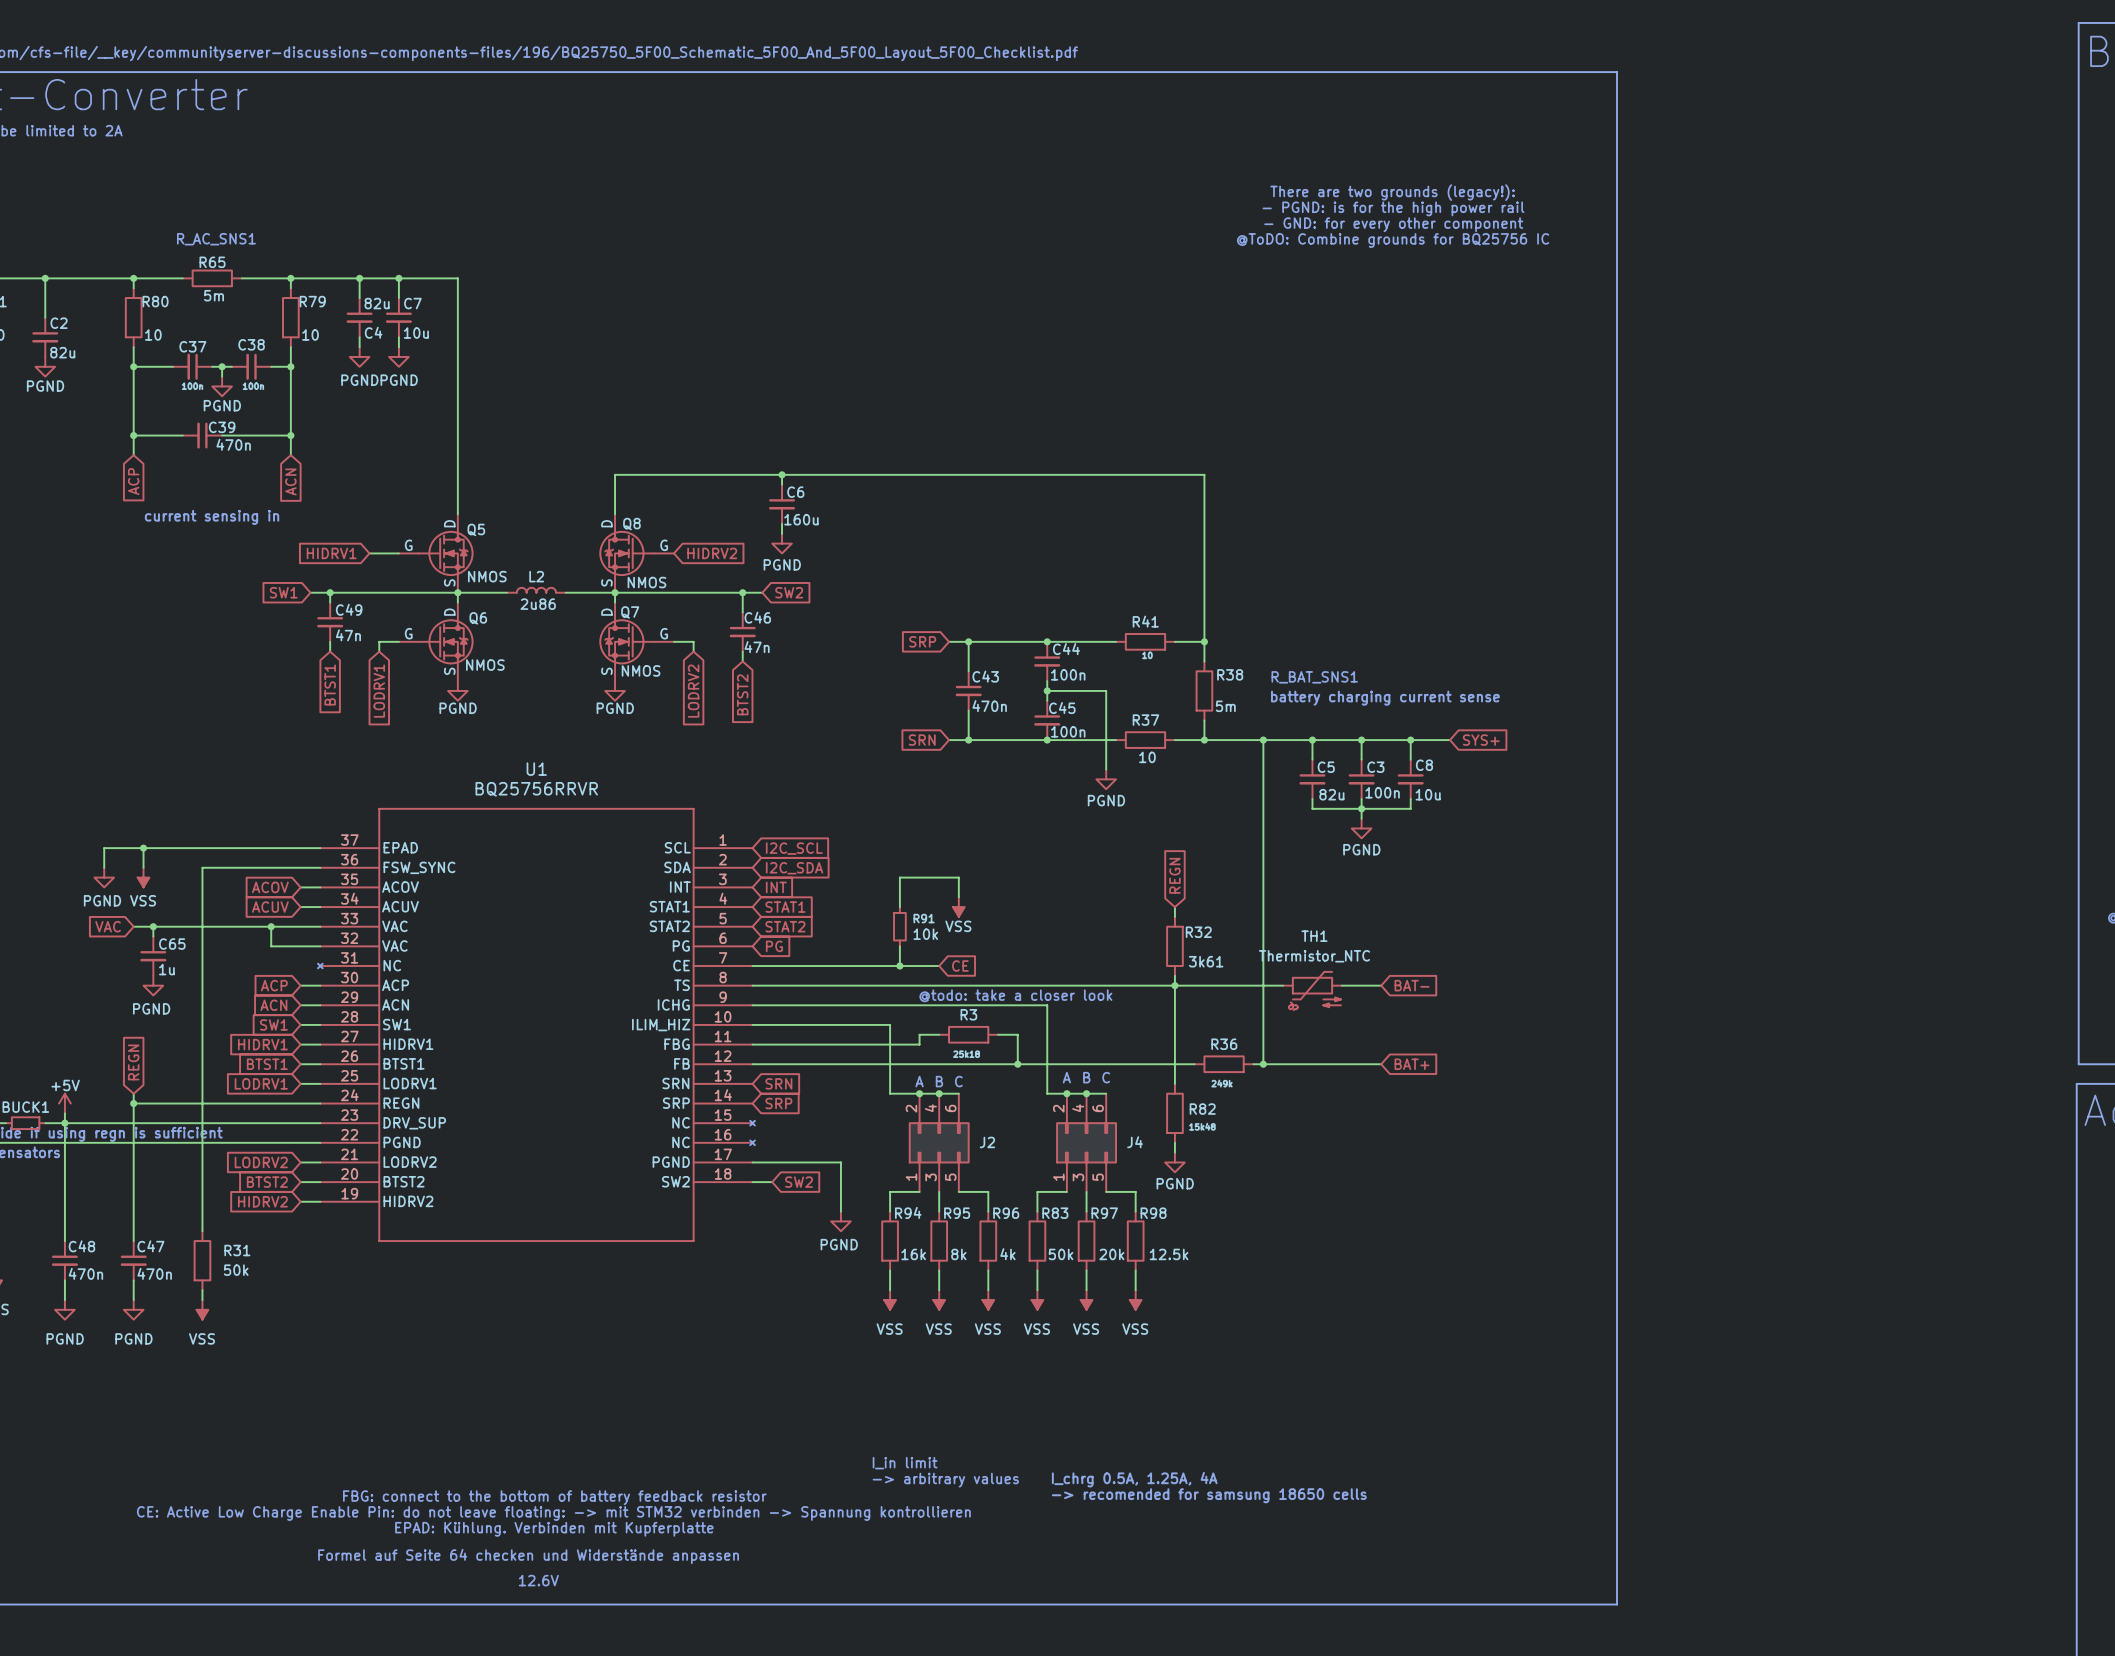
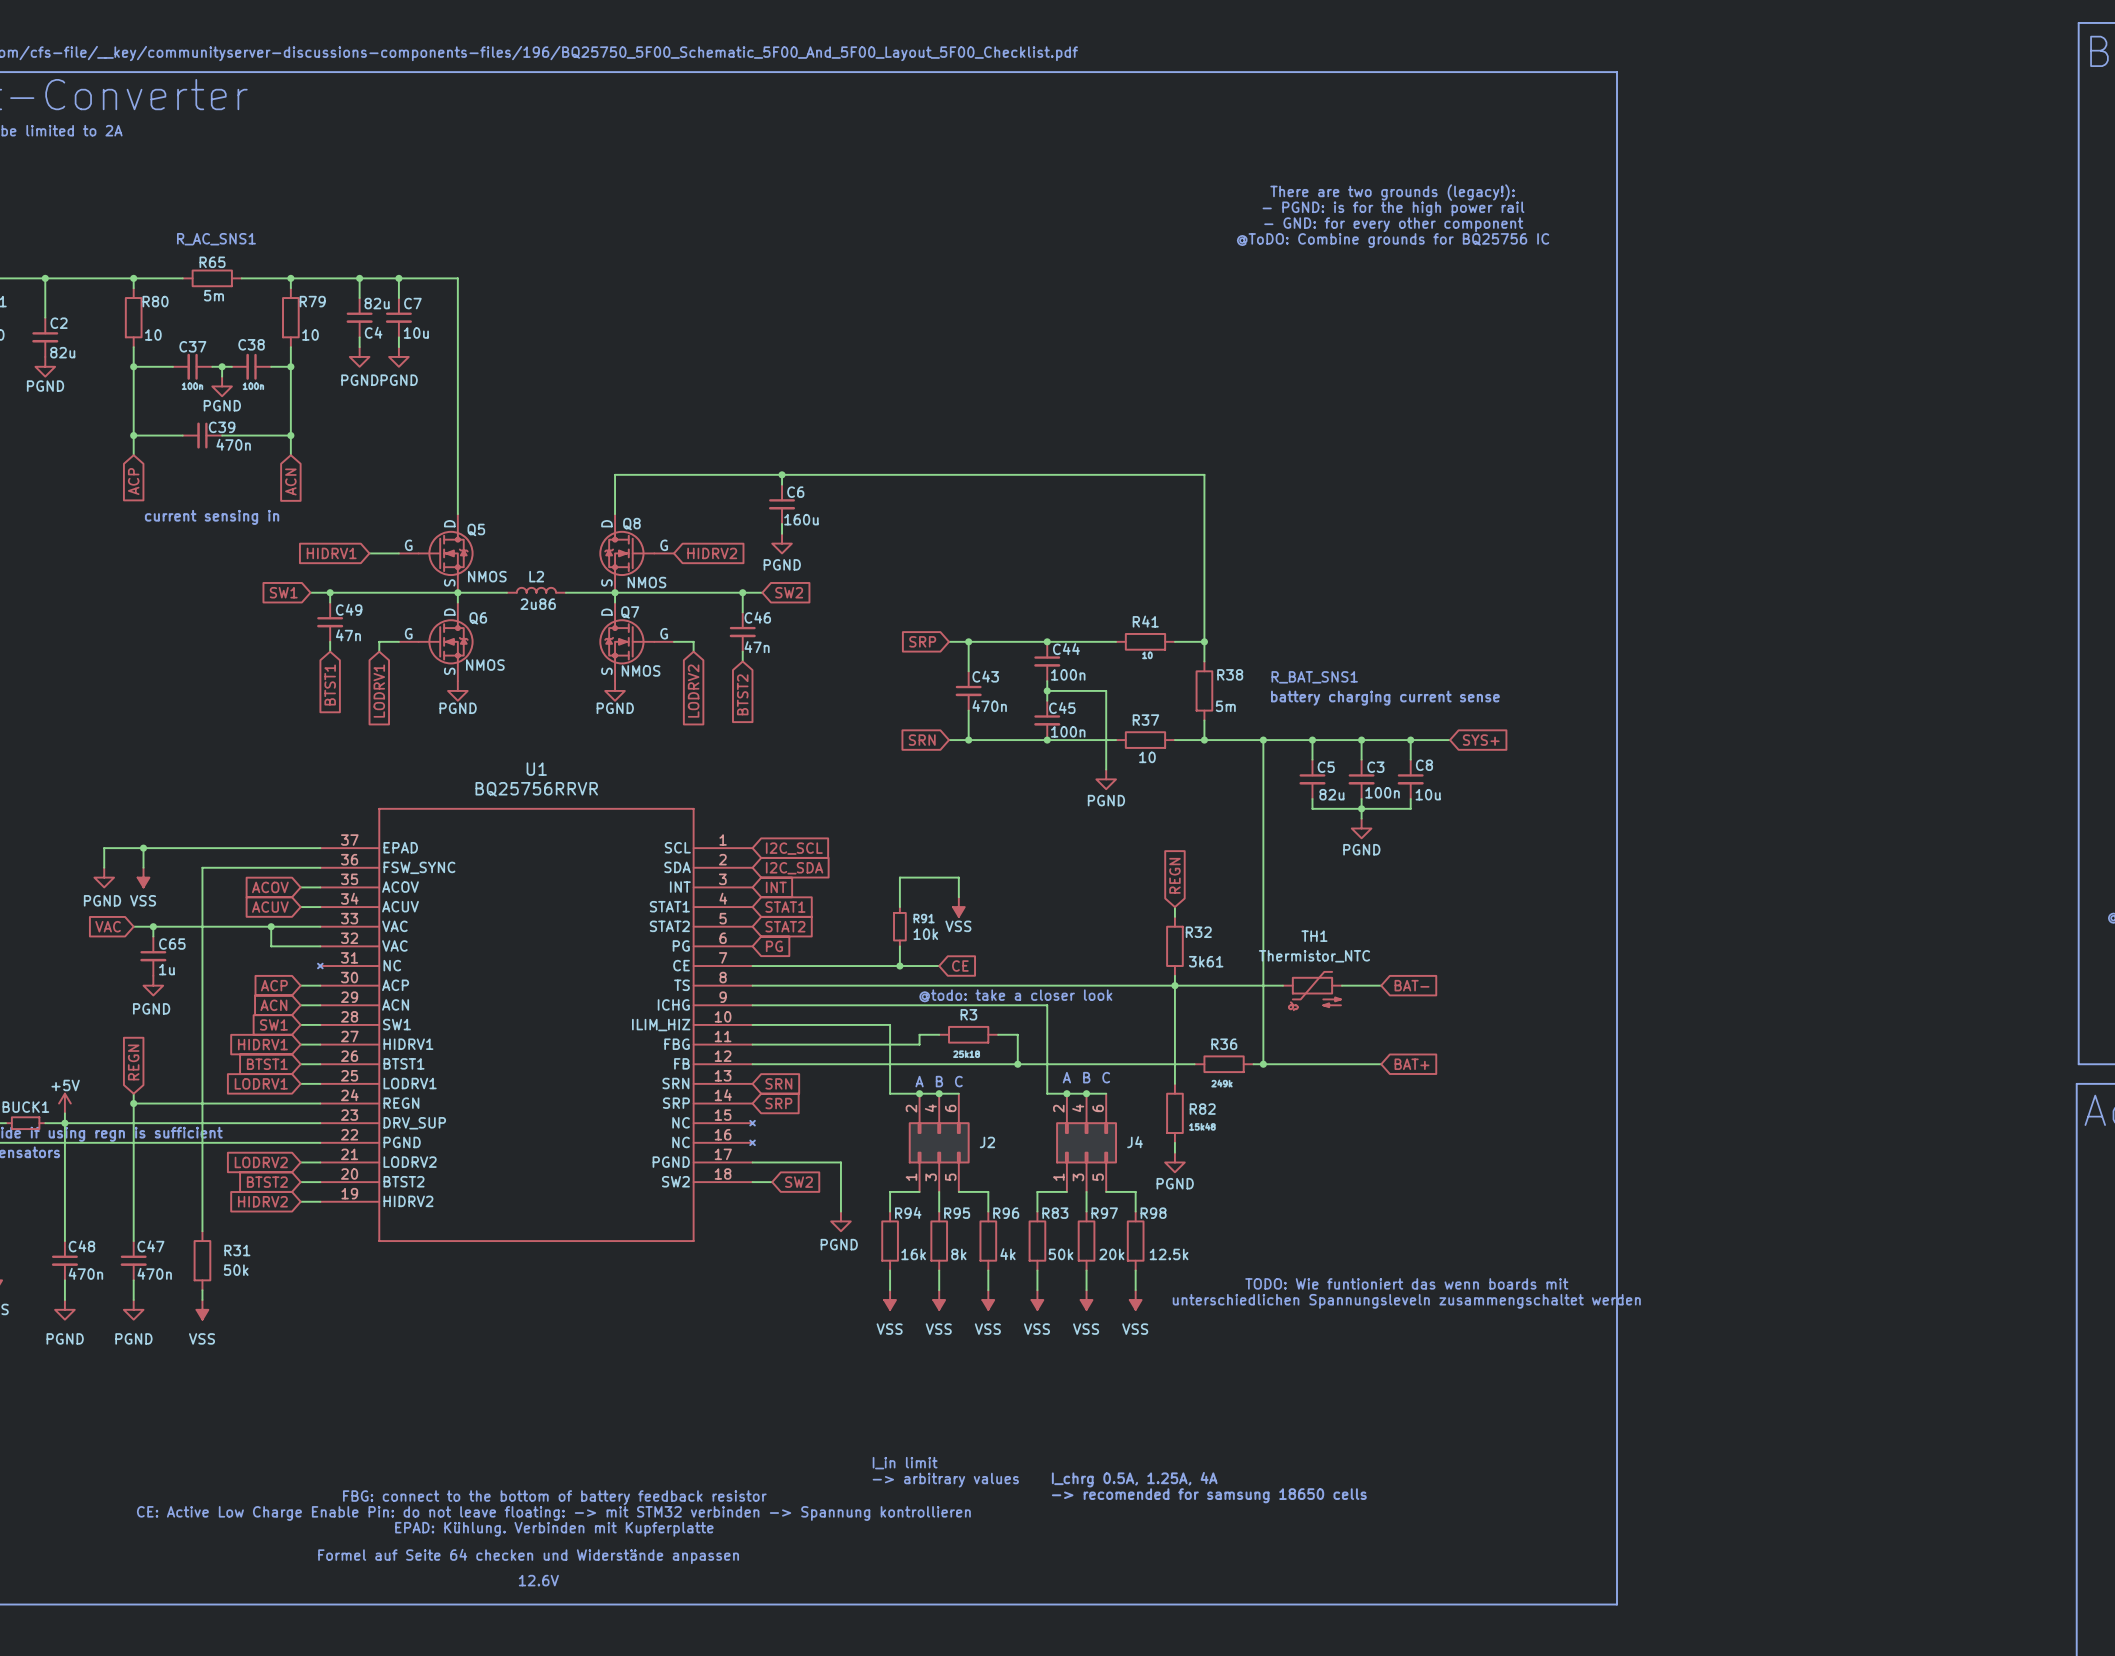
text: none -> TODO: Wie funtioniert das wenn boards mit (1406, 1283)
text: none -> unterschiedlichen Spannungsleveln zusammengschaltet werden (1406, 1301)

